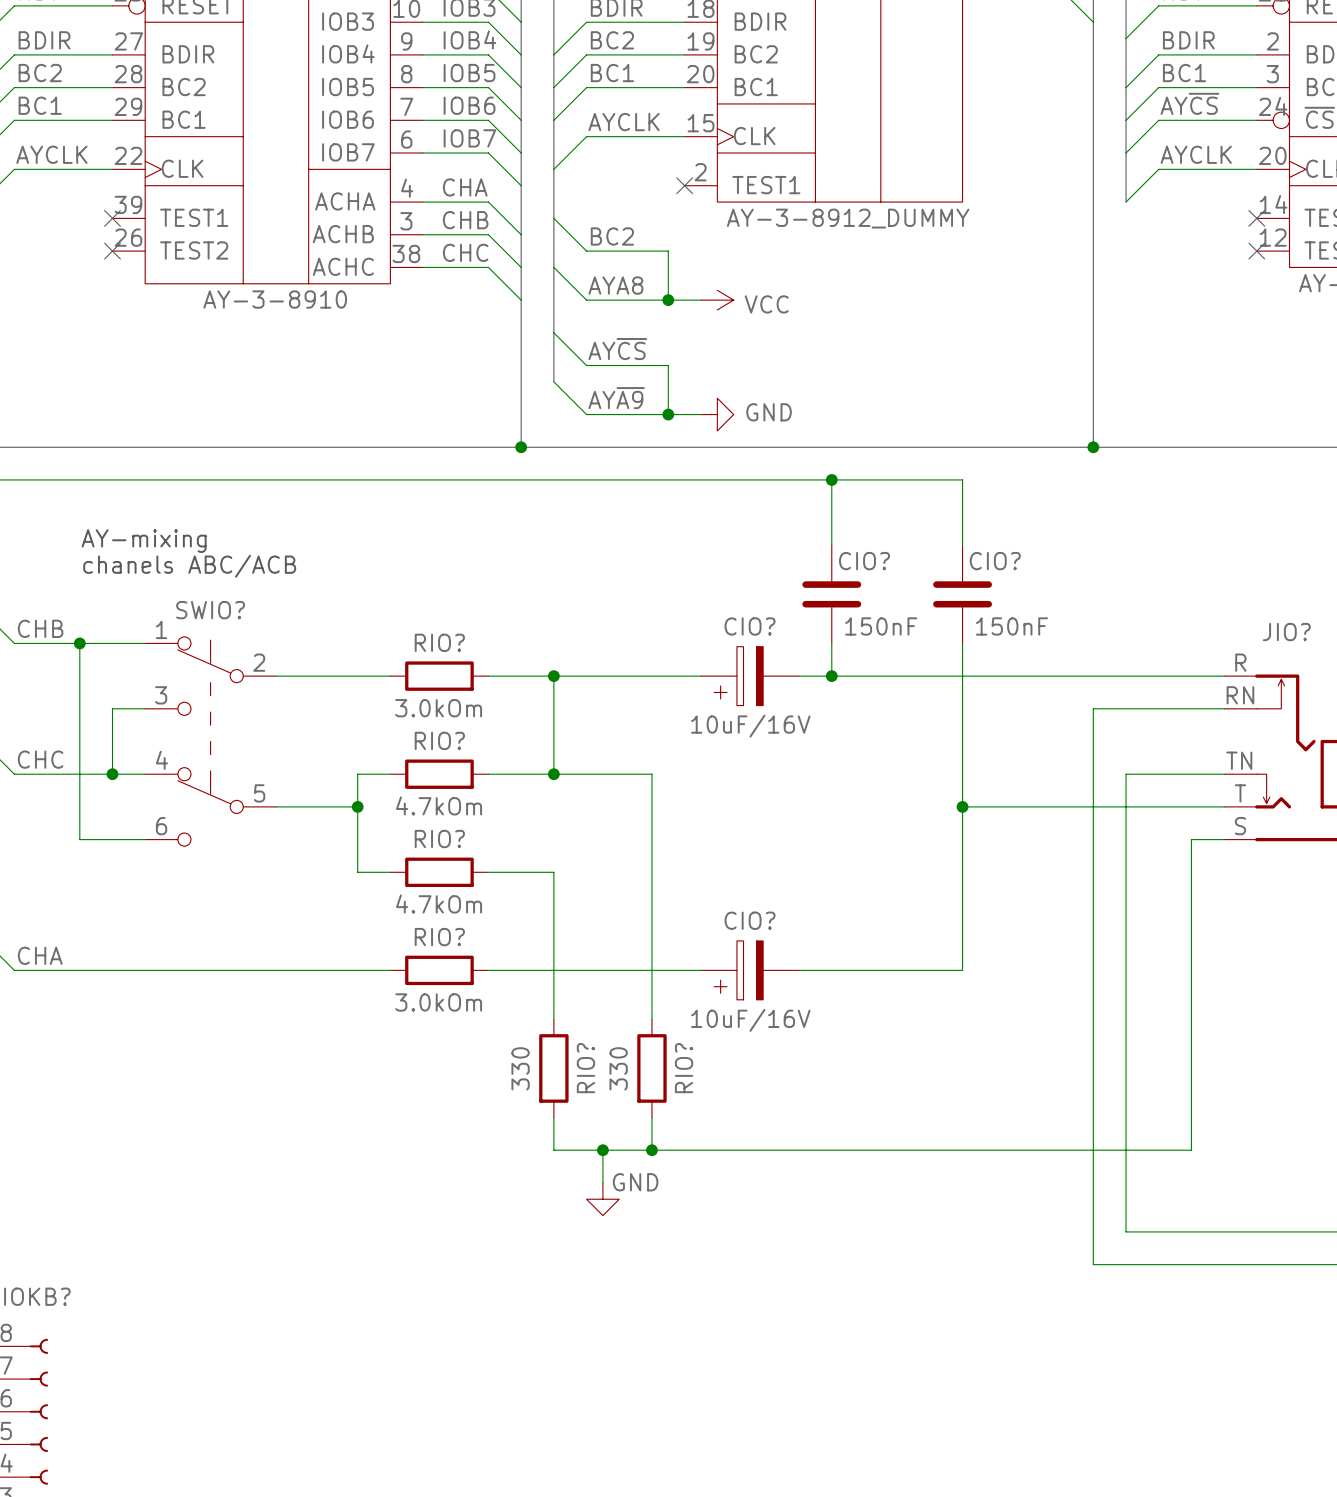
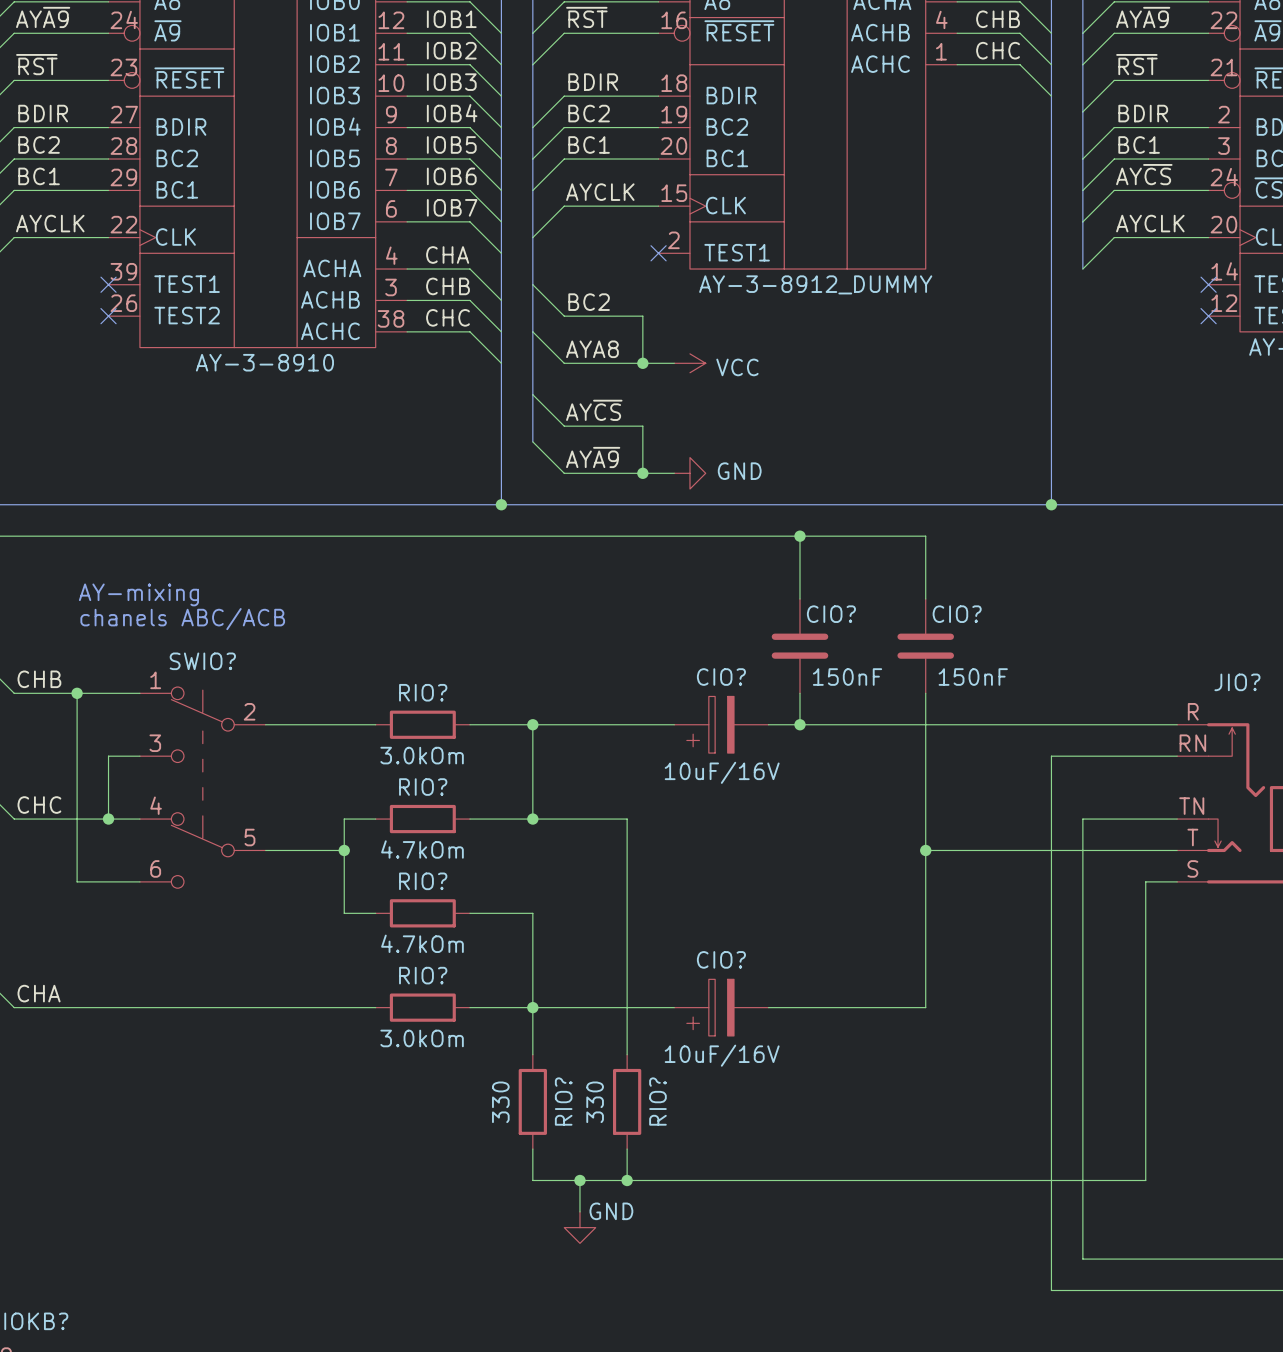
junction: none -> (532, 1007)

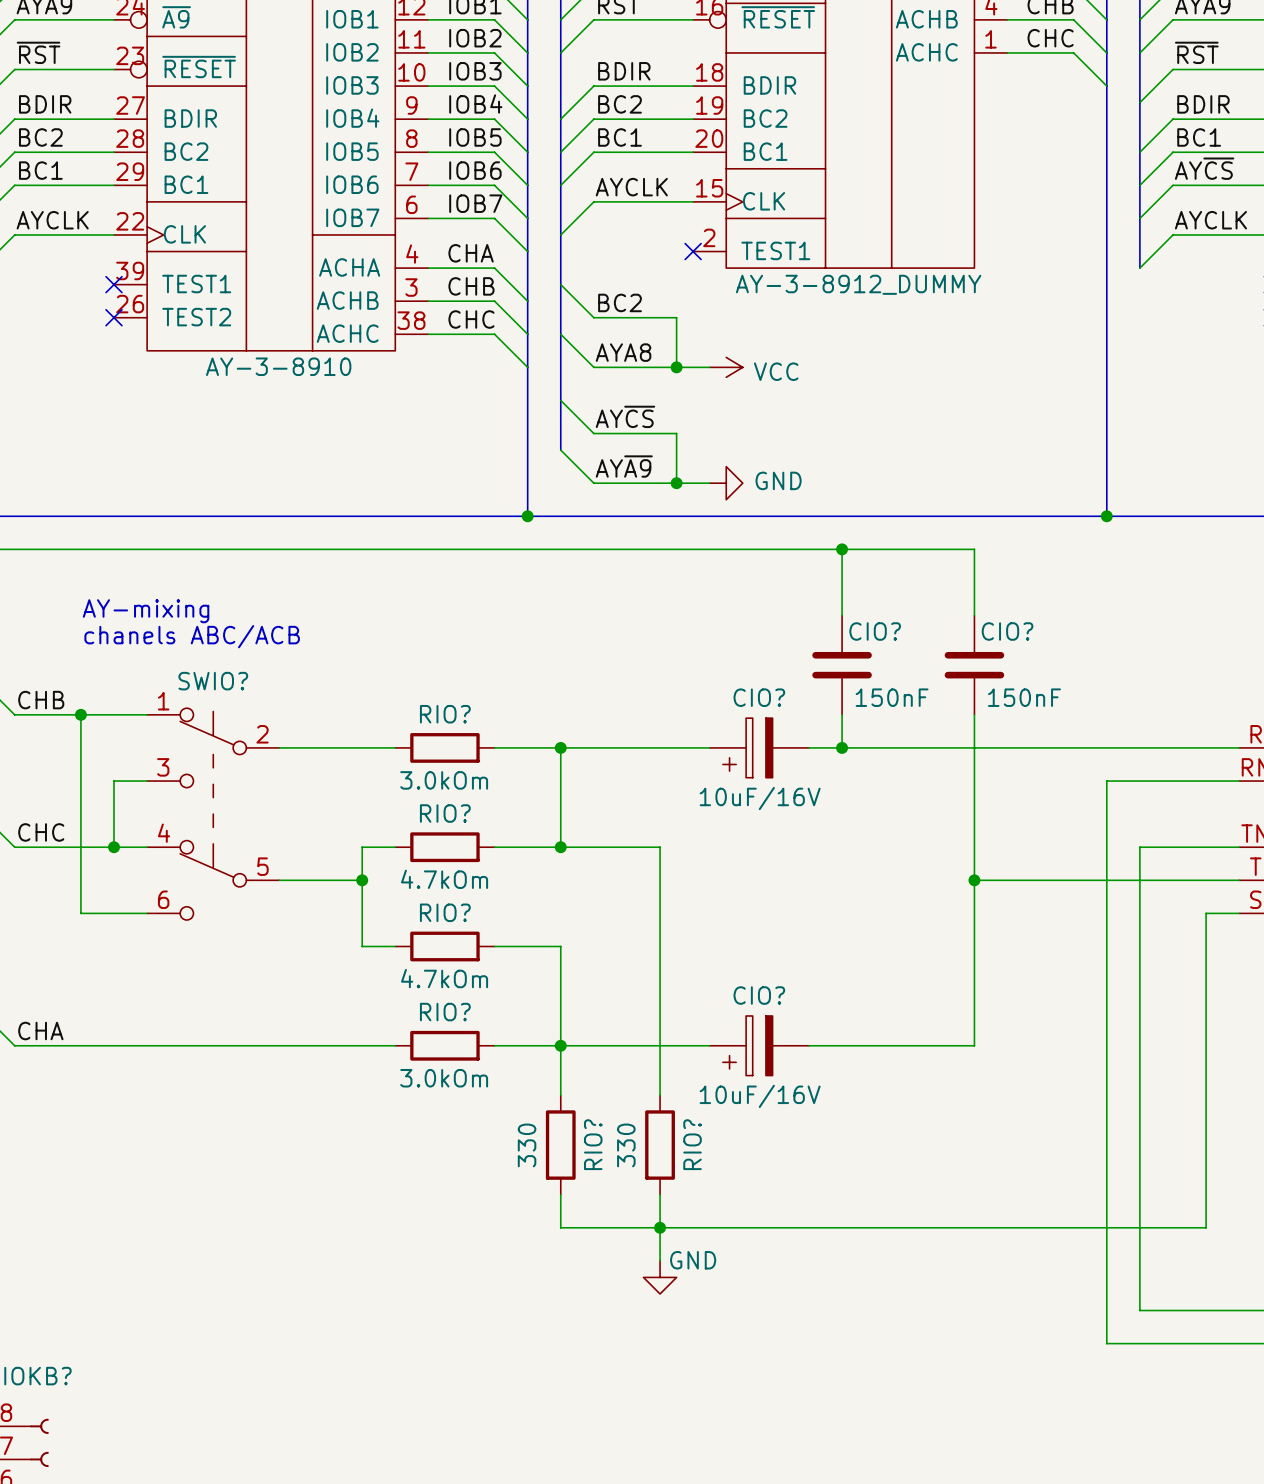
wire: (579, 1180) (579, 1211) -> (660, 1227) (660, 1260)
junction: (579, 1180) -> none
power symbol position: GND (579, 1227) -> GND (660, 1277)

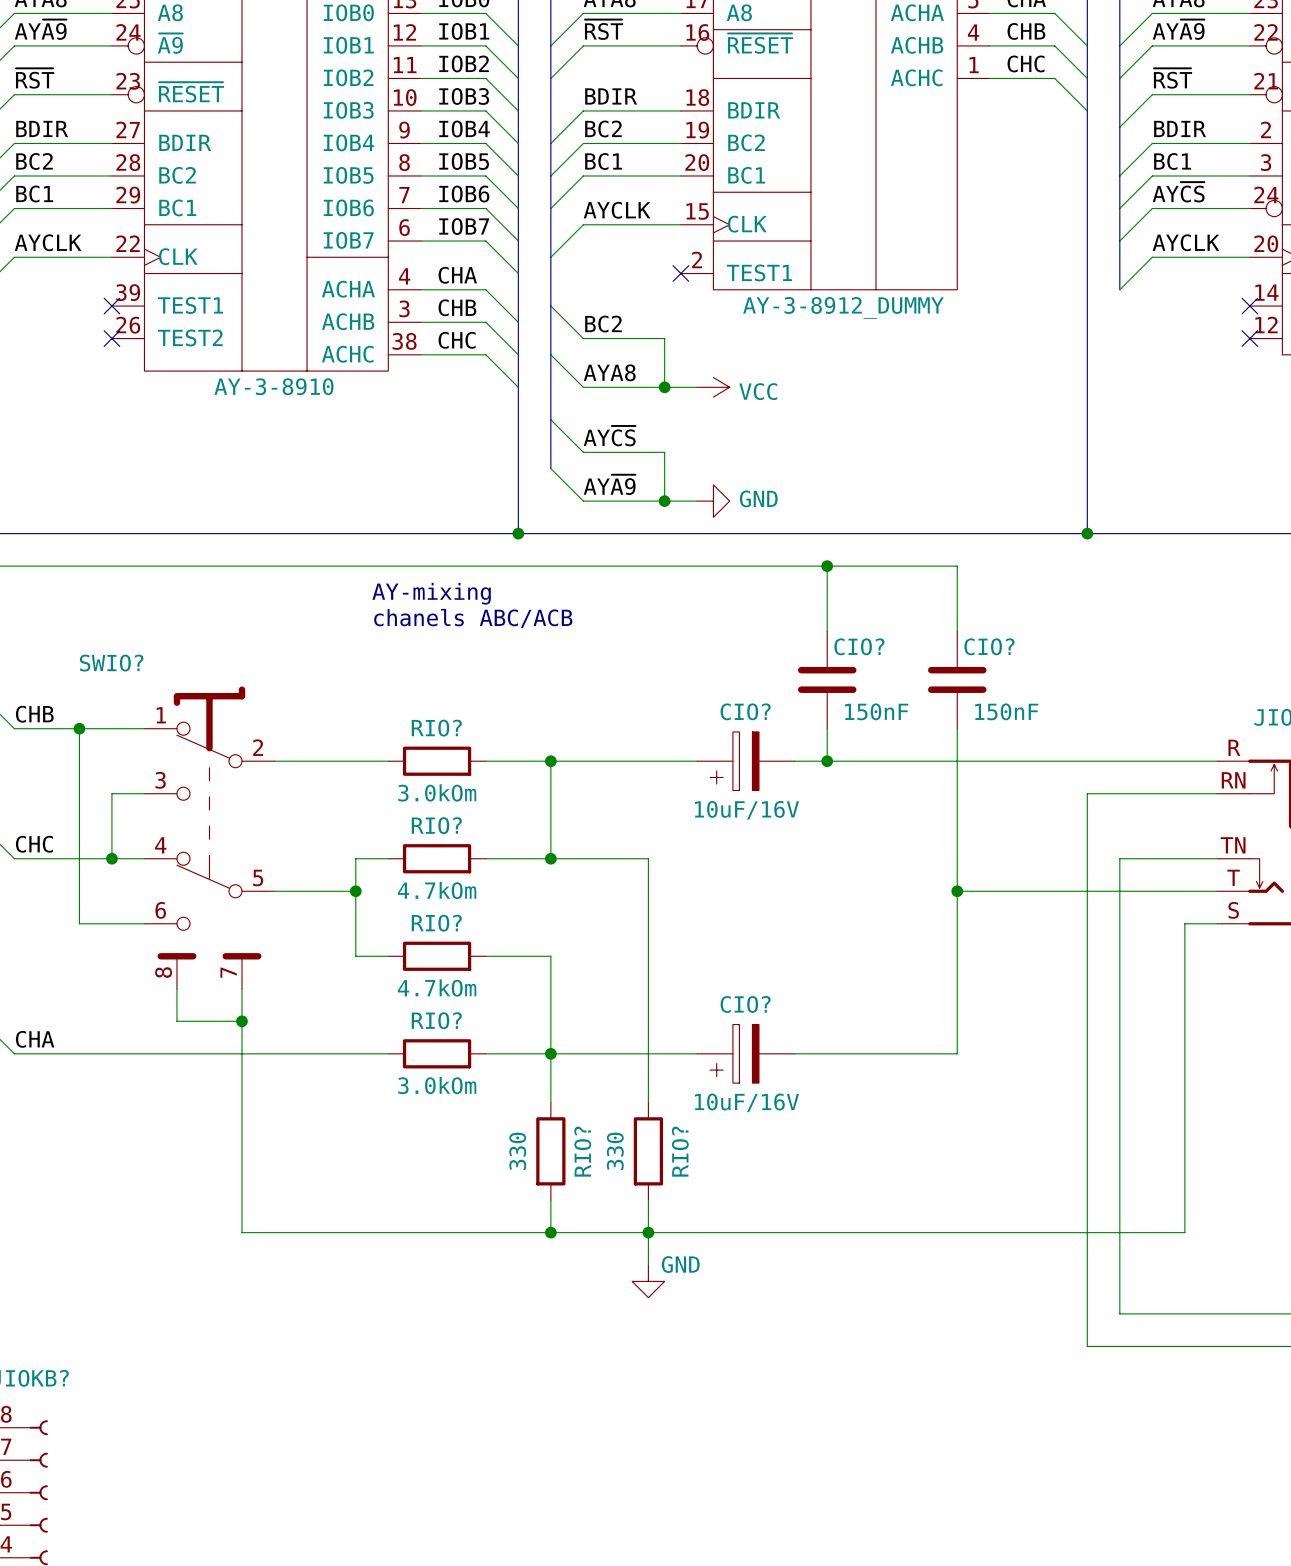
text position: AY-mixing (146, 611) -> AY-mixing (431, 593)
text position: chanels ABC/ACB (192, 636) -> chanels ABC/ACB (473, 618)
SWIO? name position: SWIO? (213, 681) -> SWIO? (111, 663)
SWIO? symbol: [147, 708, 280, 921] -> [144, 686, 275, 989]
wire: none -> (176, 988) (176, 1021) (241, 1021)
wire: none -> (241, 988) (241, 1232) (550, 1232)
junction: none -> (241, 1021)
junction: none -> (550, 1232)

